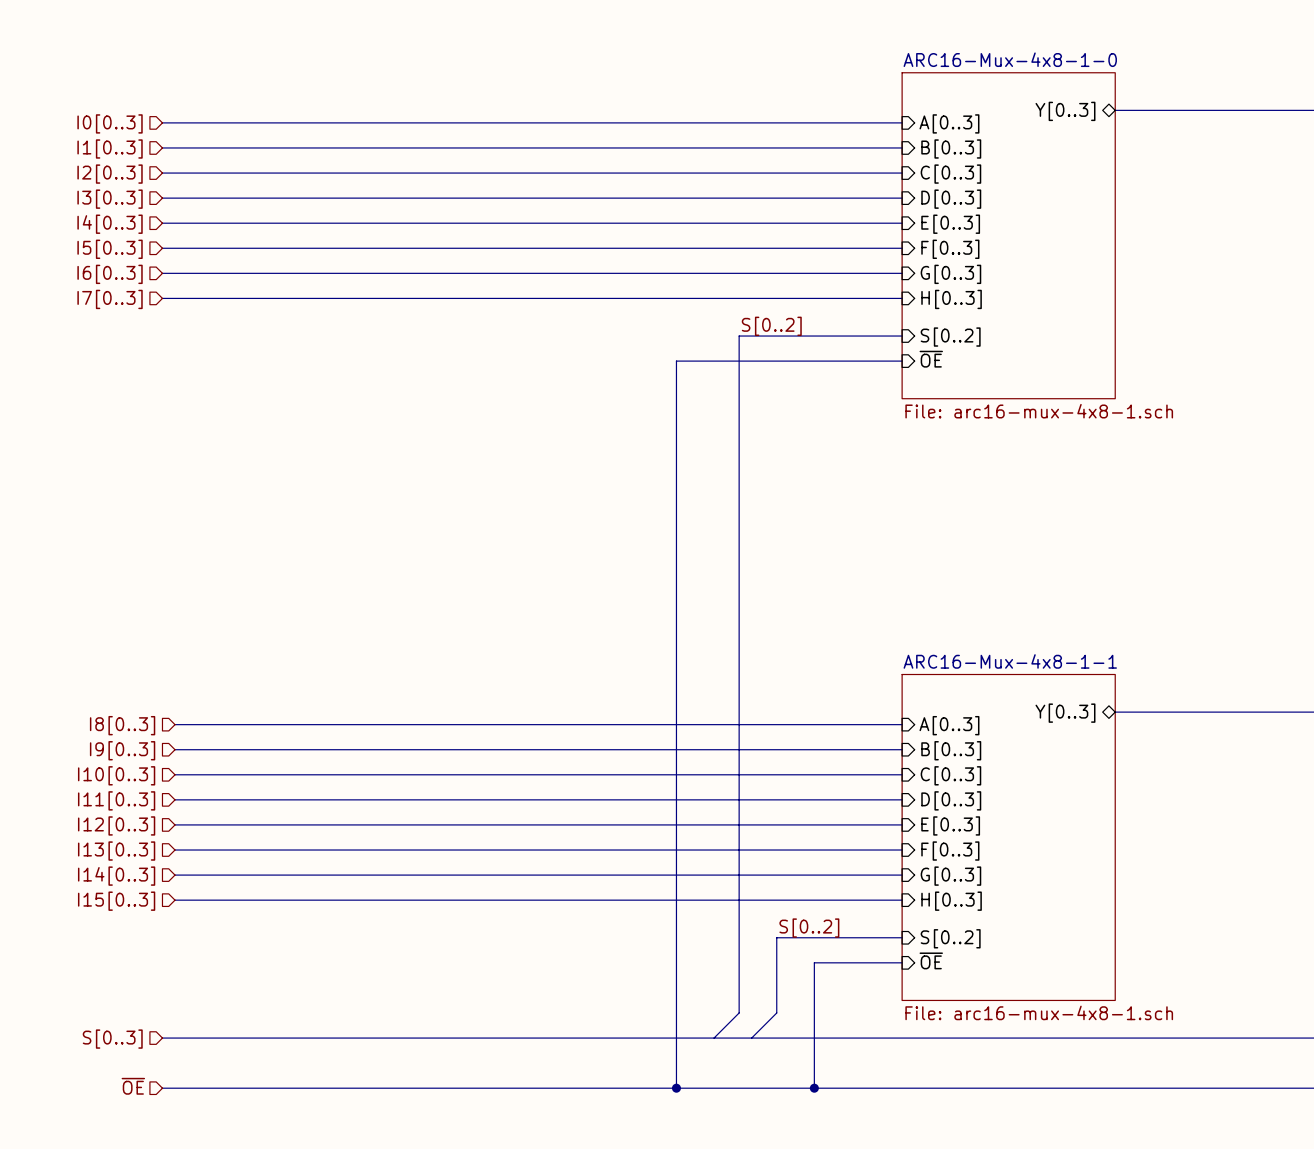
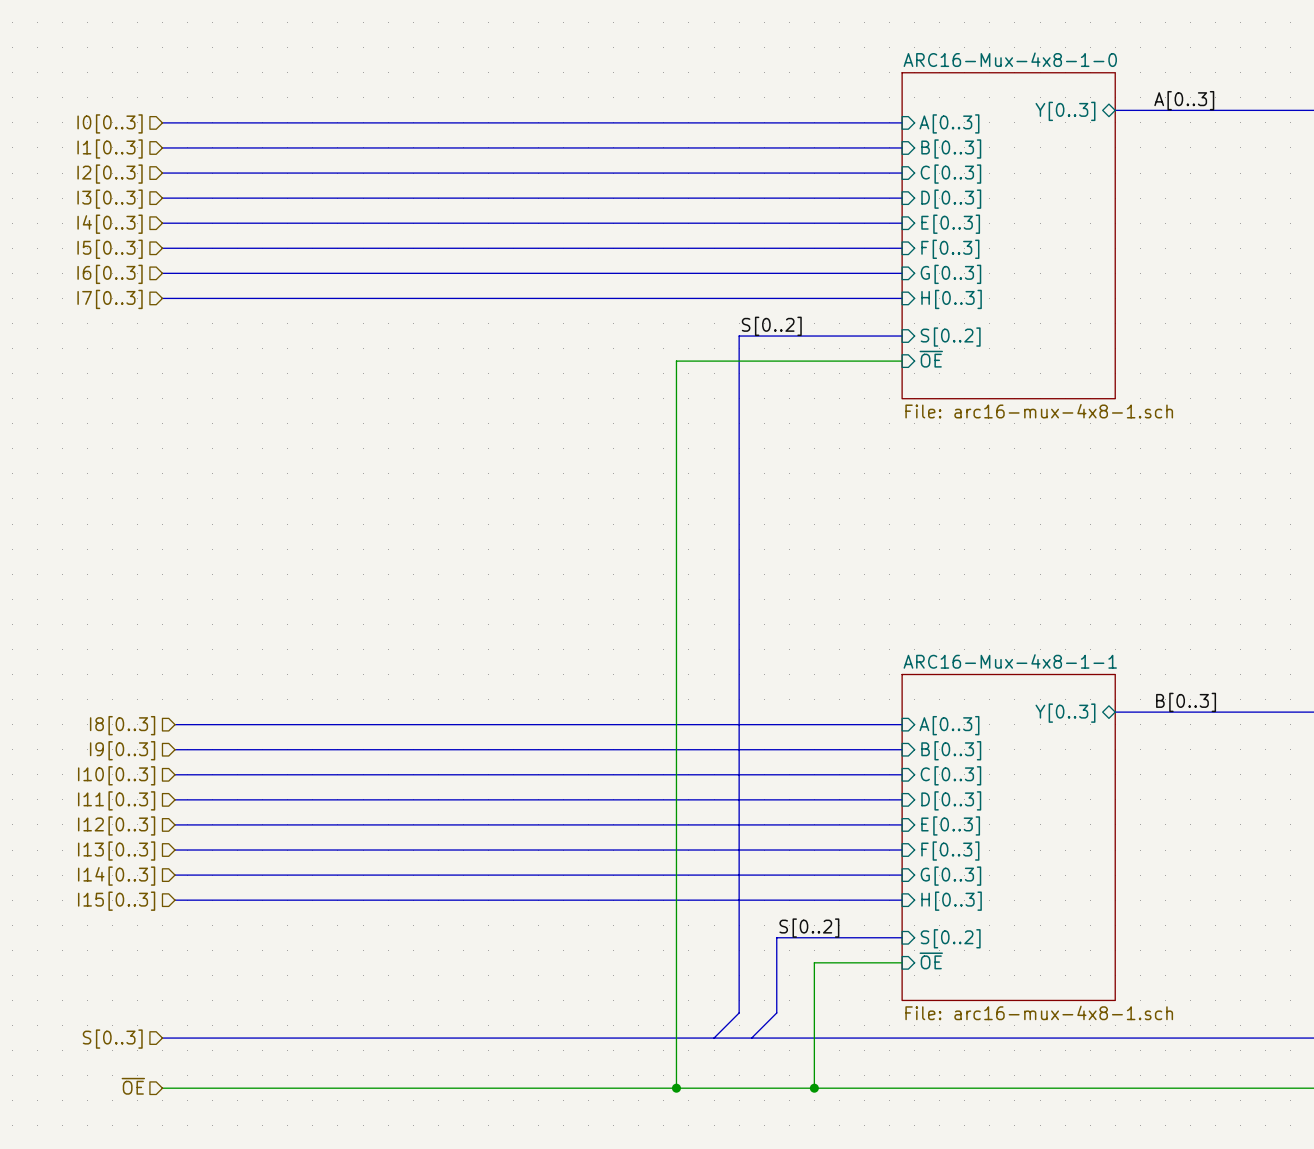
label: none -> A[0..3] (1184, 100)
label: none -> B[0..3] (1186, 702)

